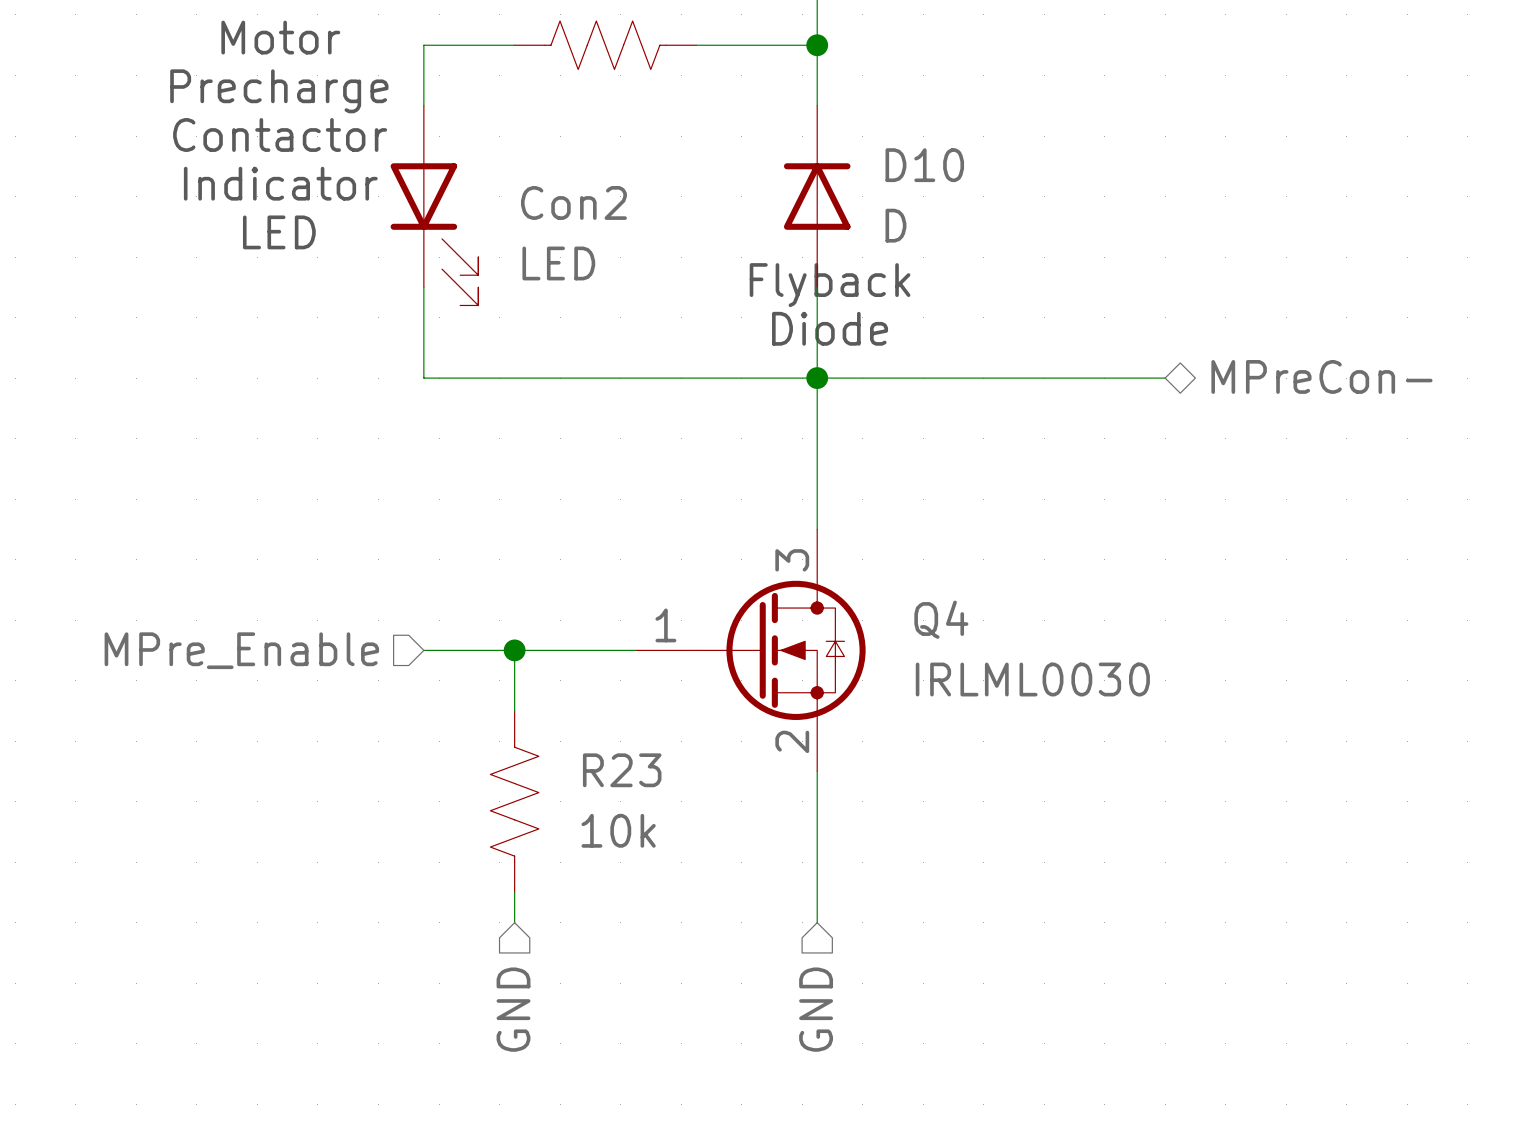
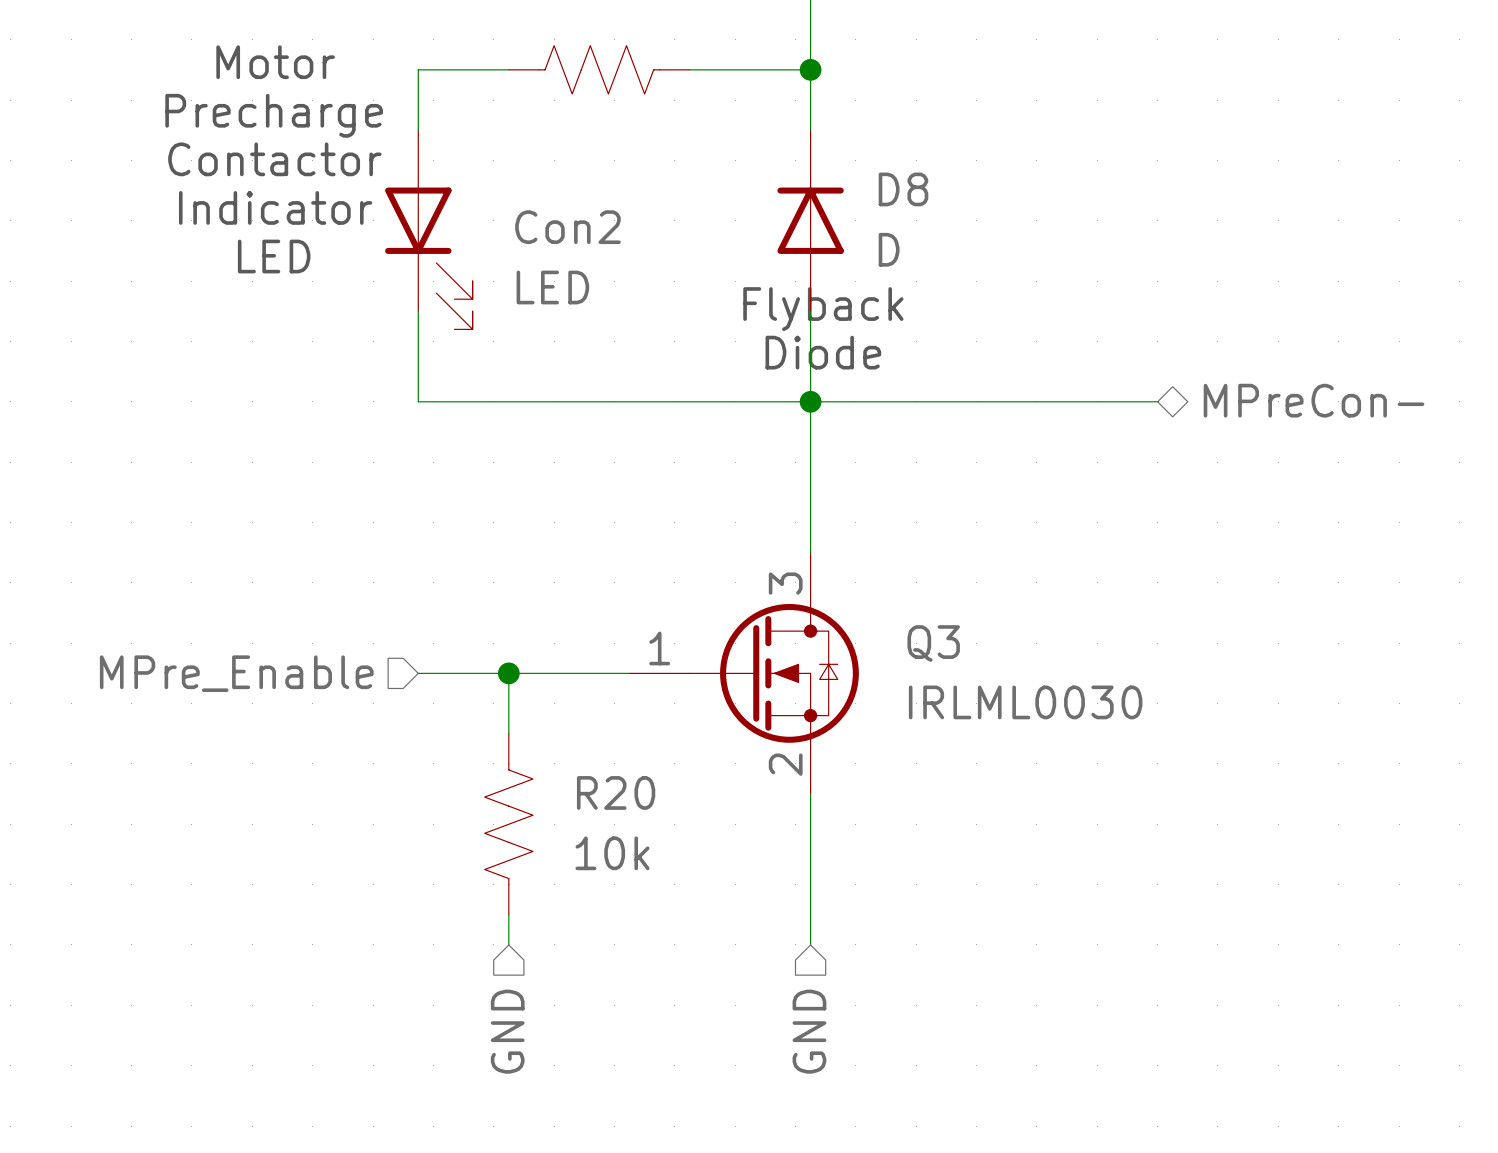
D10 name: D10 (924, 165) -> D8 (903, 189)
Q4 name: Q4 (941, 619) -> Q3 (933, 643)
R23 name: R23 (622, 770) -> R20 (616, 792)

